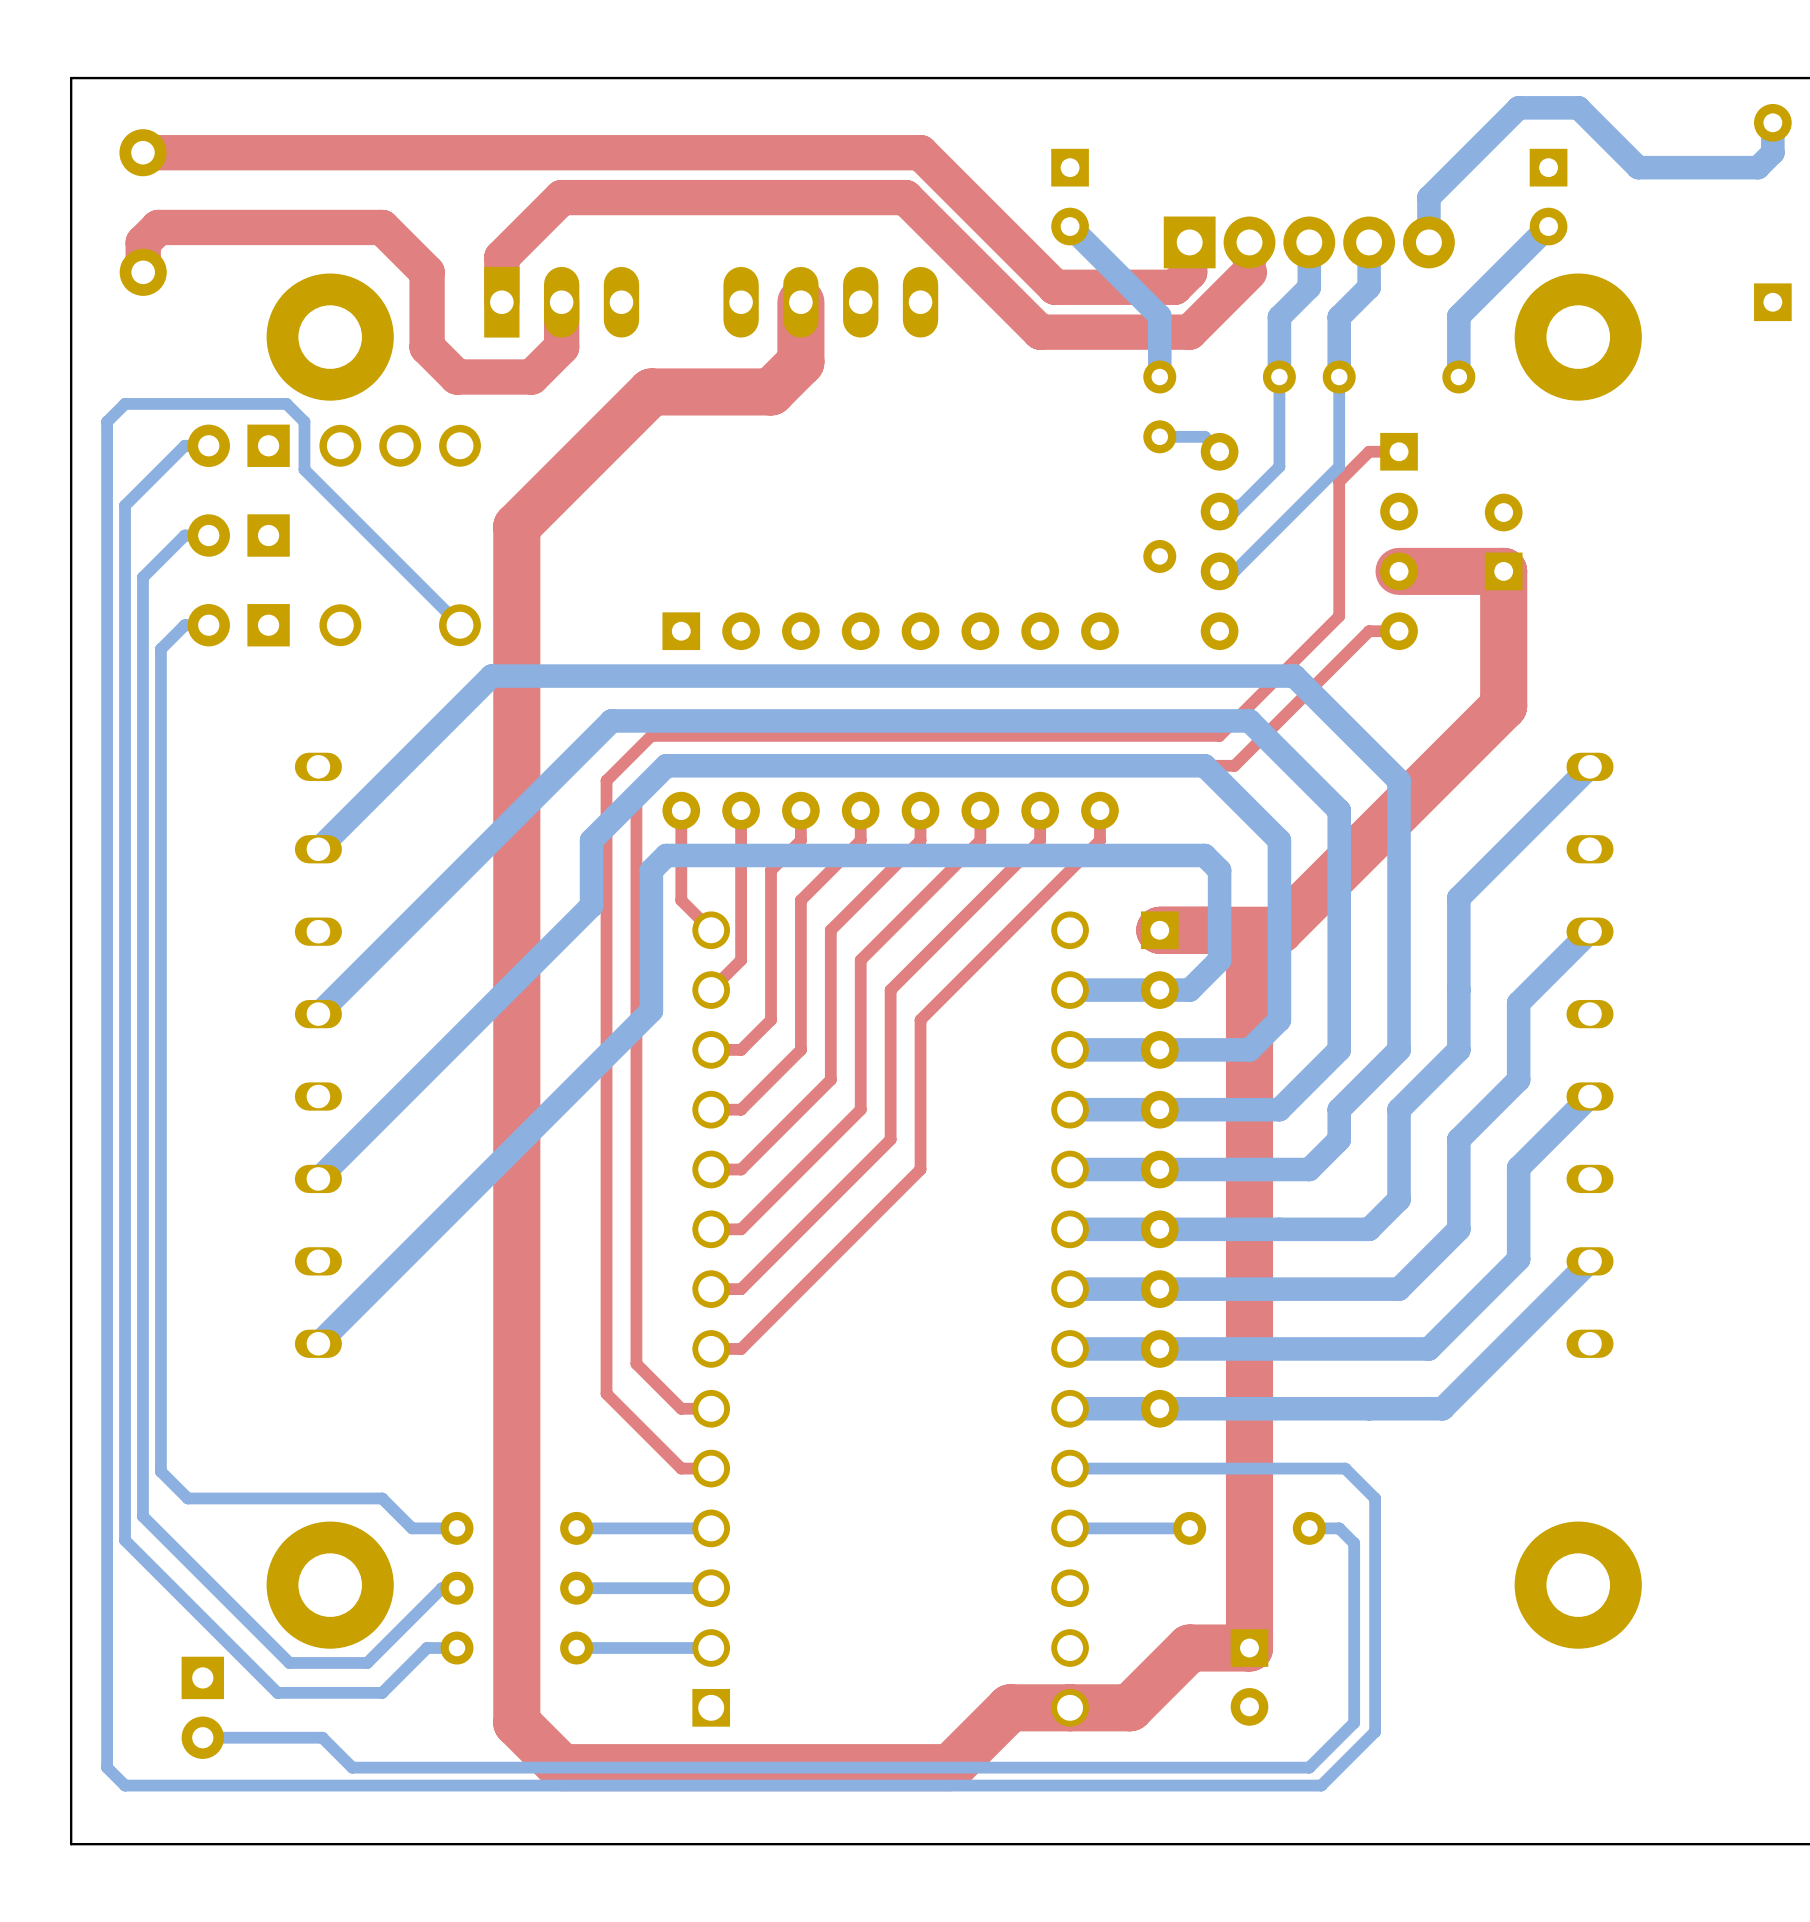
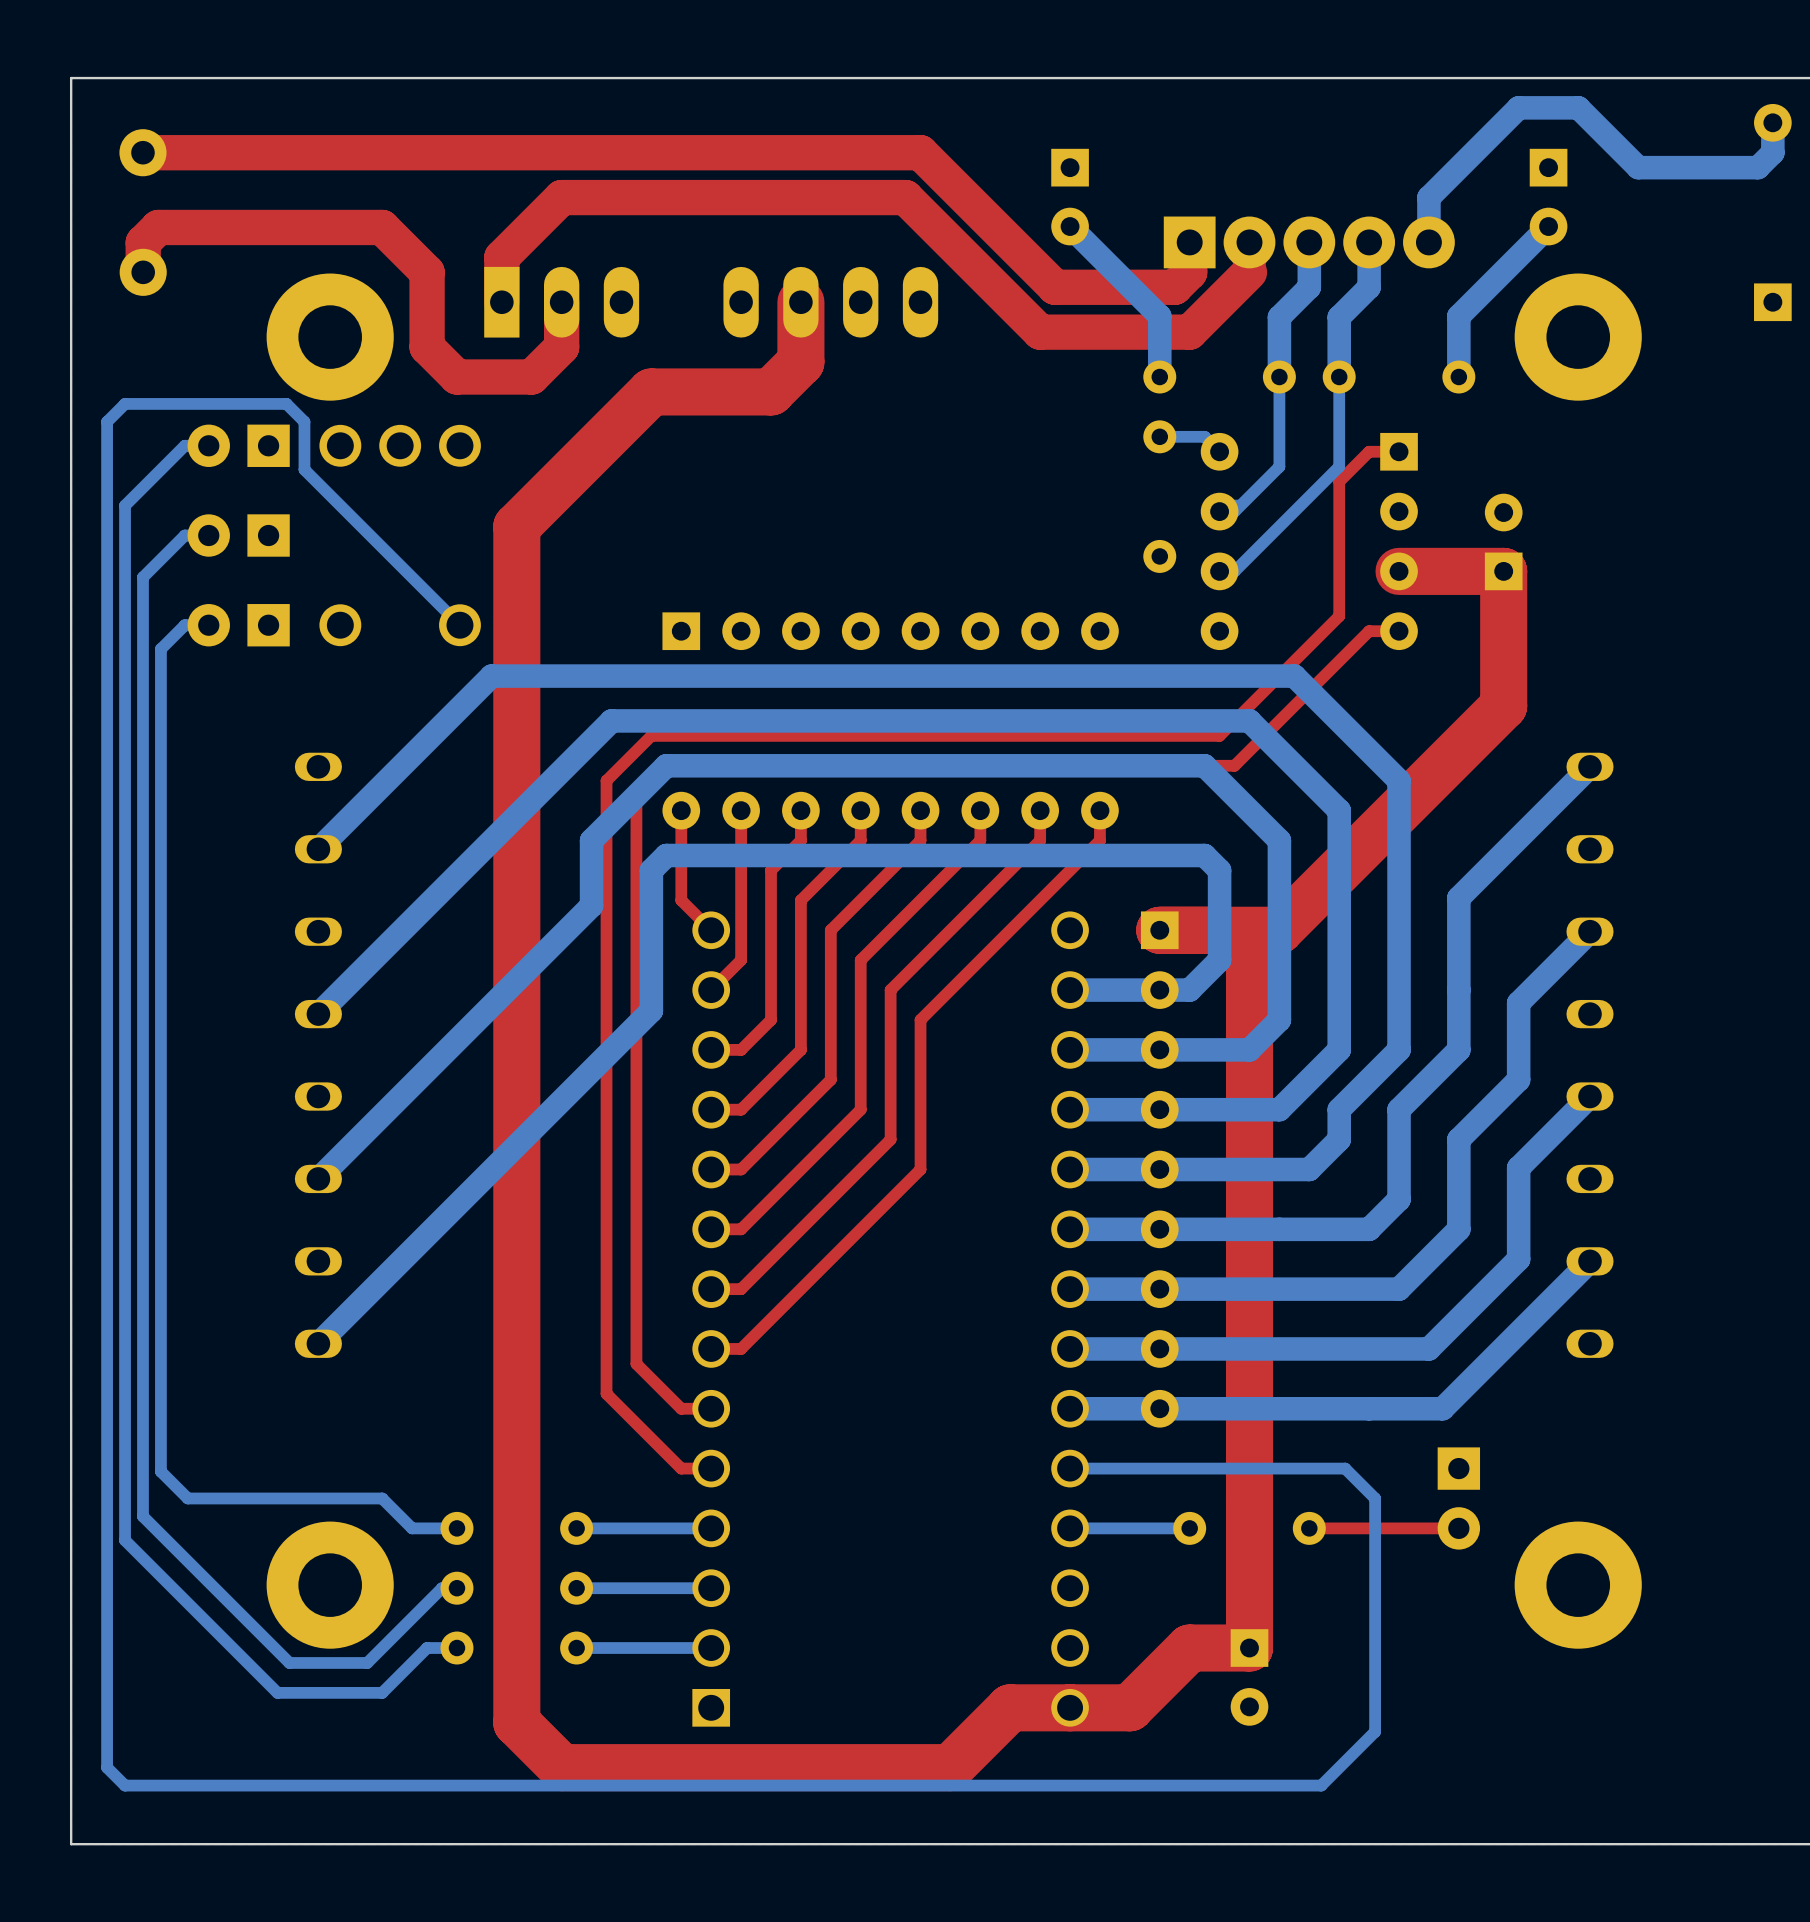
part: none -> (1458, 1498)
bottom track: (1309, 1528) (1339, 1528) (1354, 1543) (1354, 1722) (1309, 1767) (352, 1767) (322, 1737) (202, 1737) -> none
top track: none -> (1458, 1528) (1309, 1528)
part: (202, 1707) -> none

